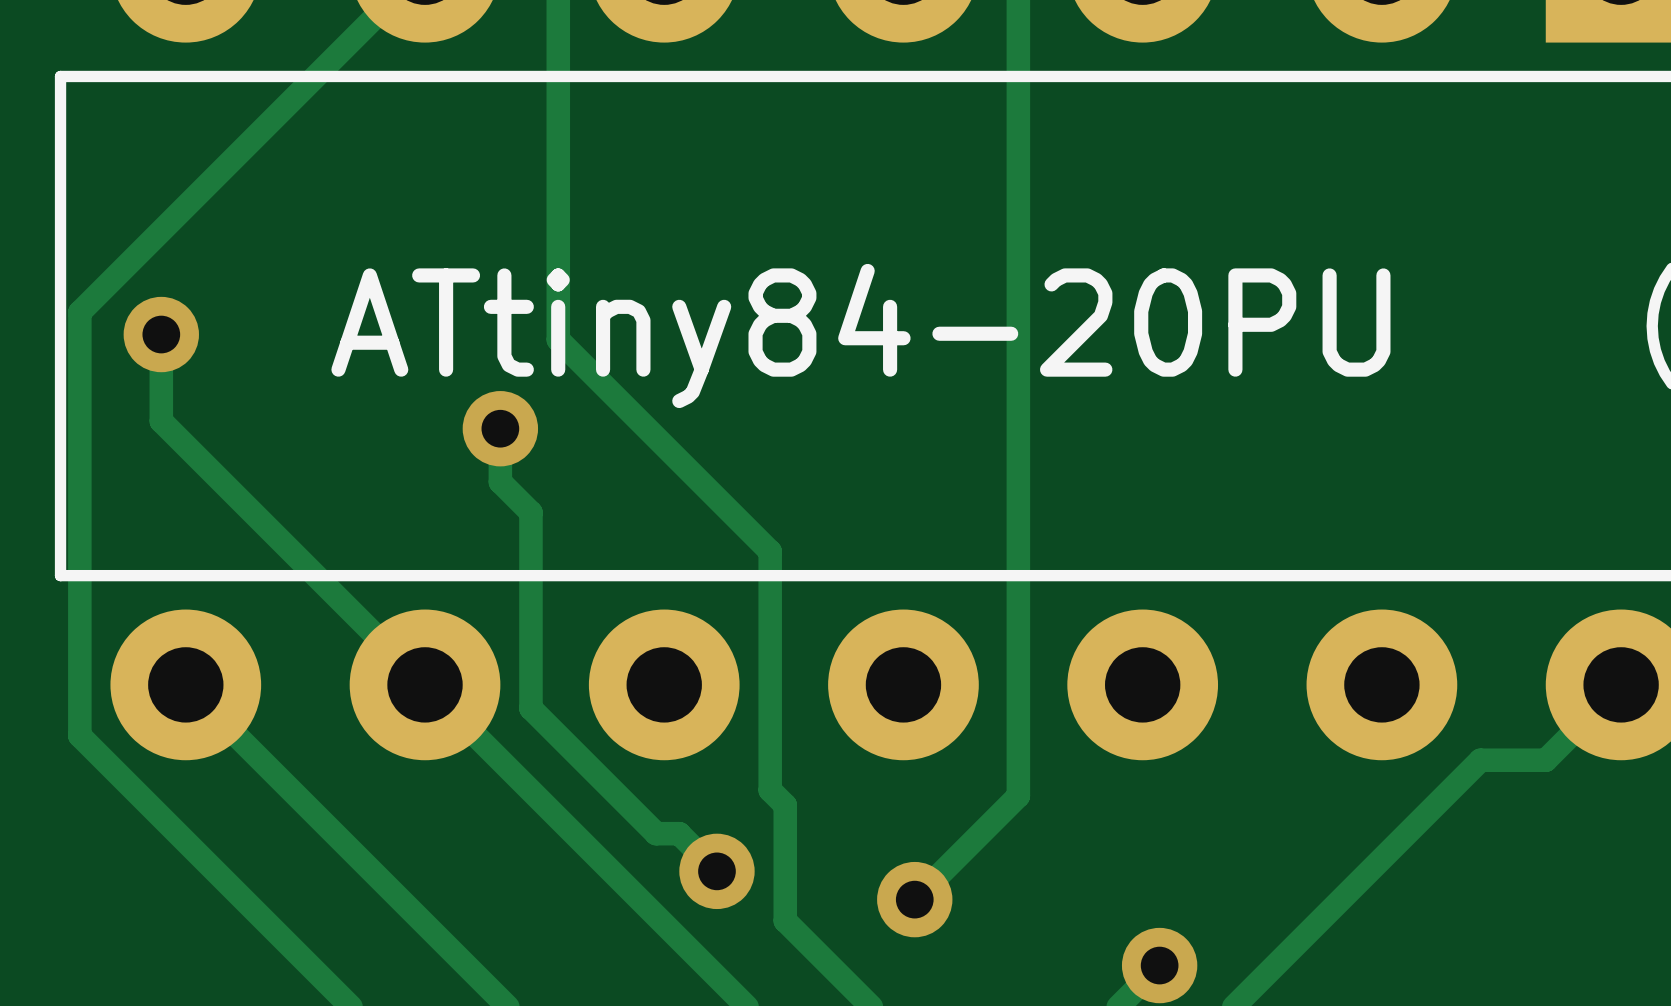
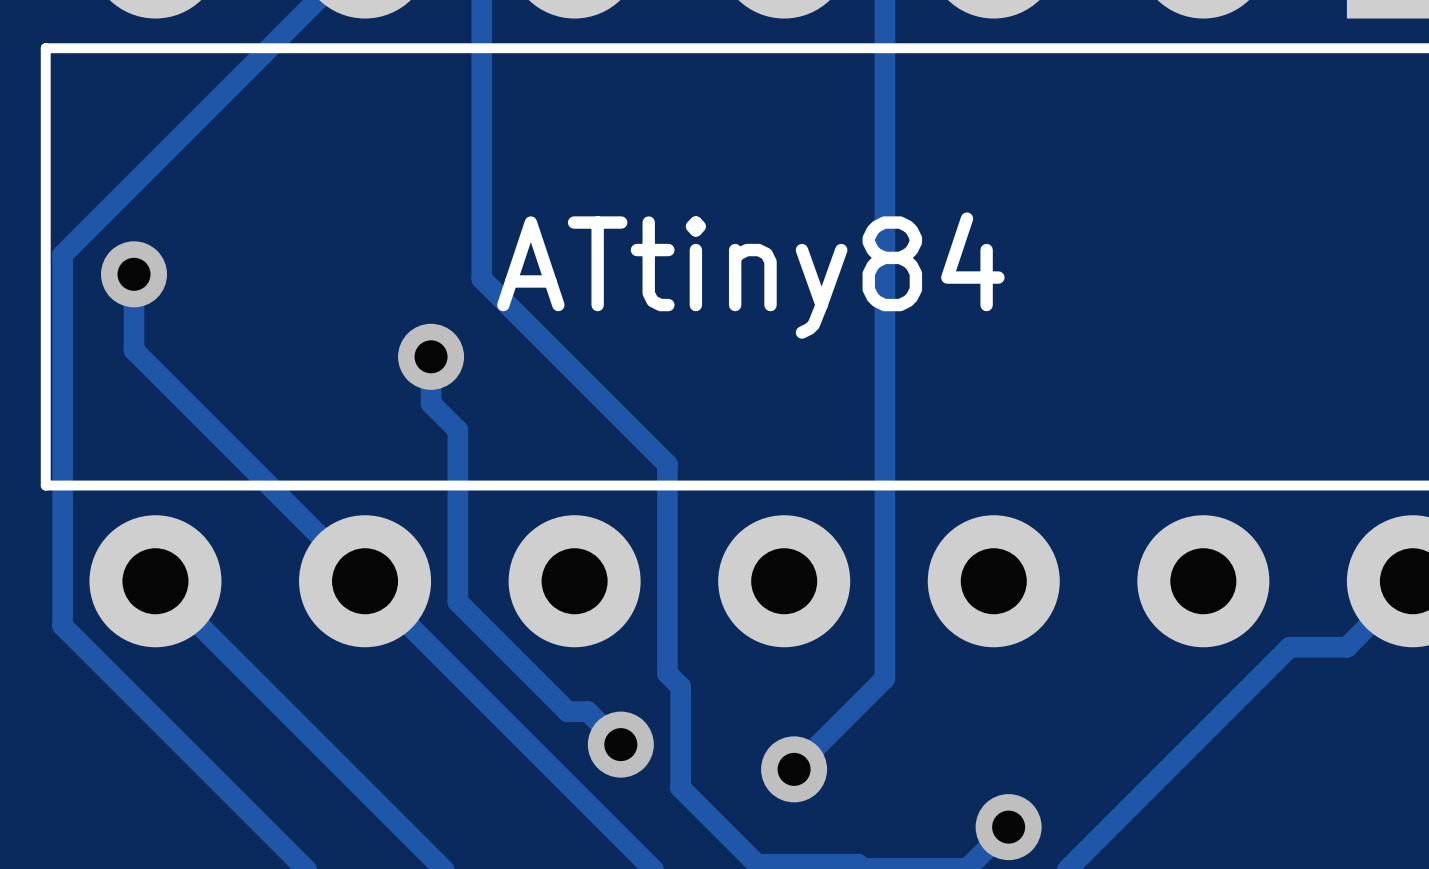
part value: ATtiny84-20PU (860, 335) -> ATtiny84 (750, 275)

